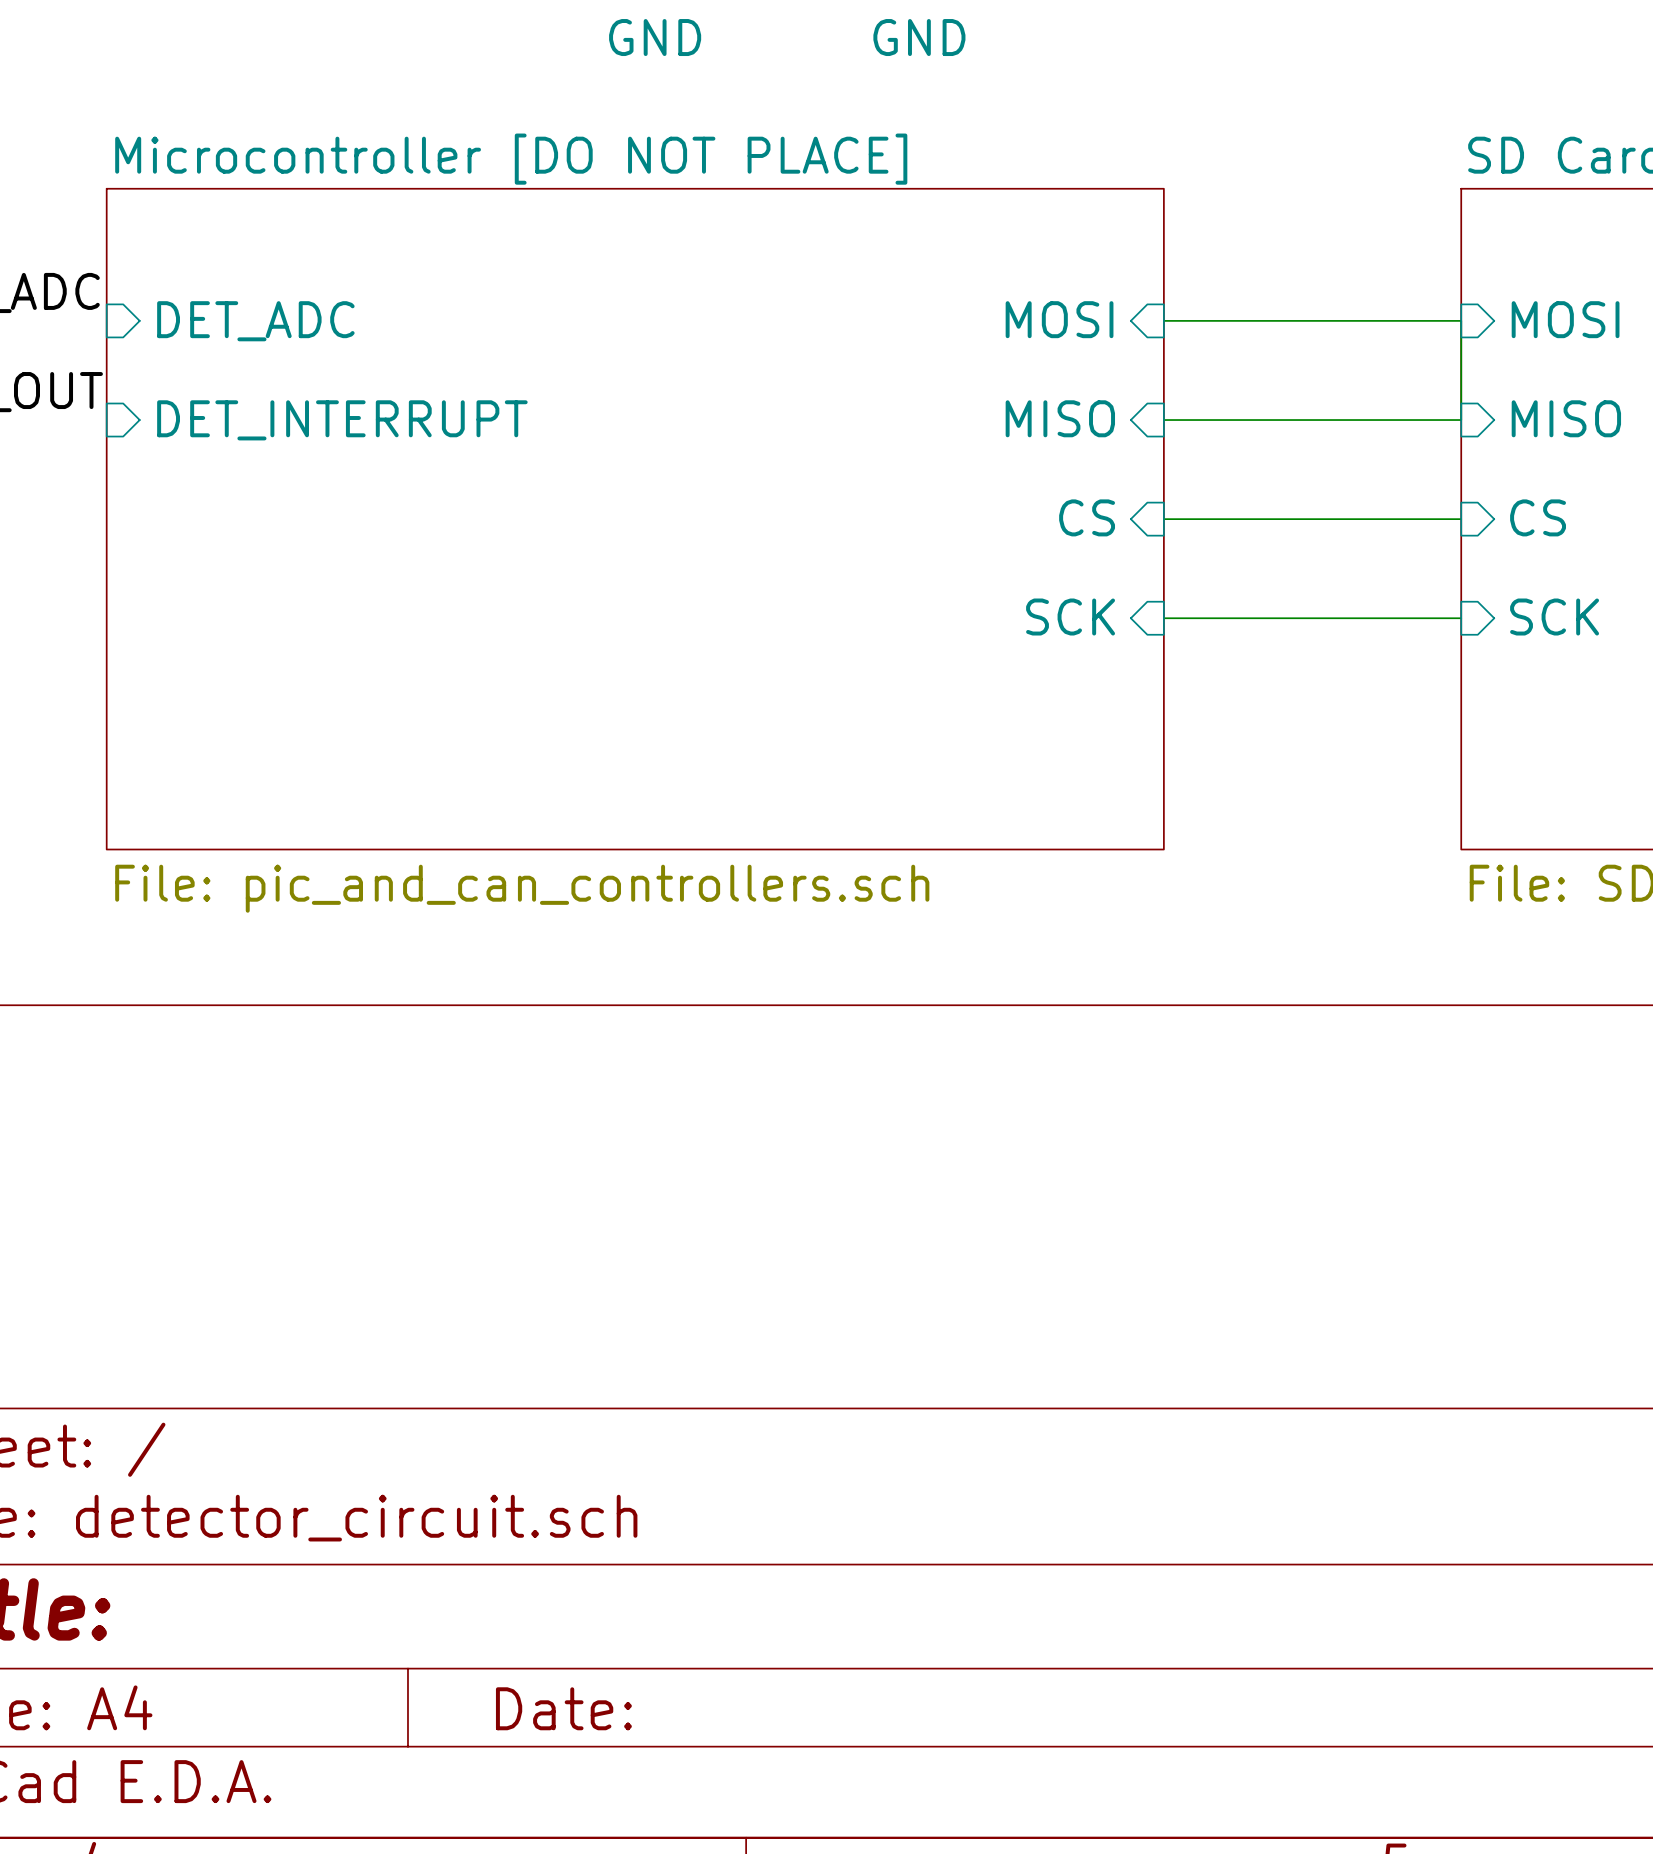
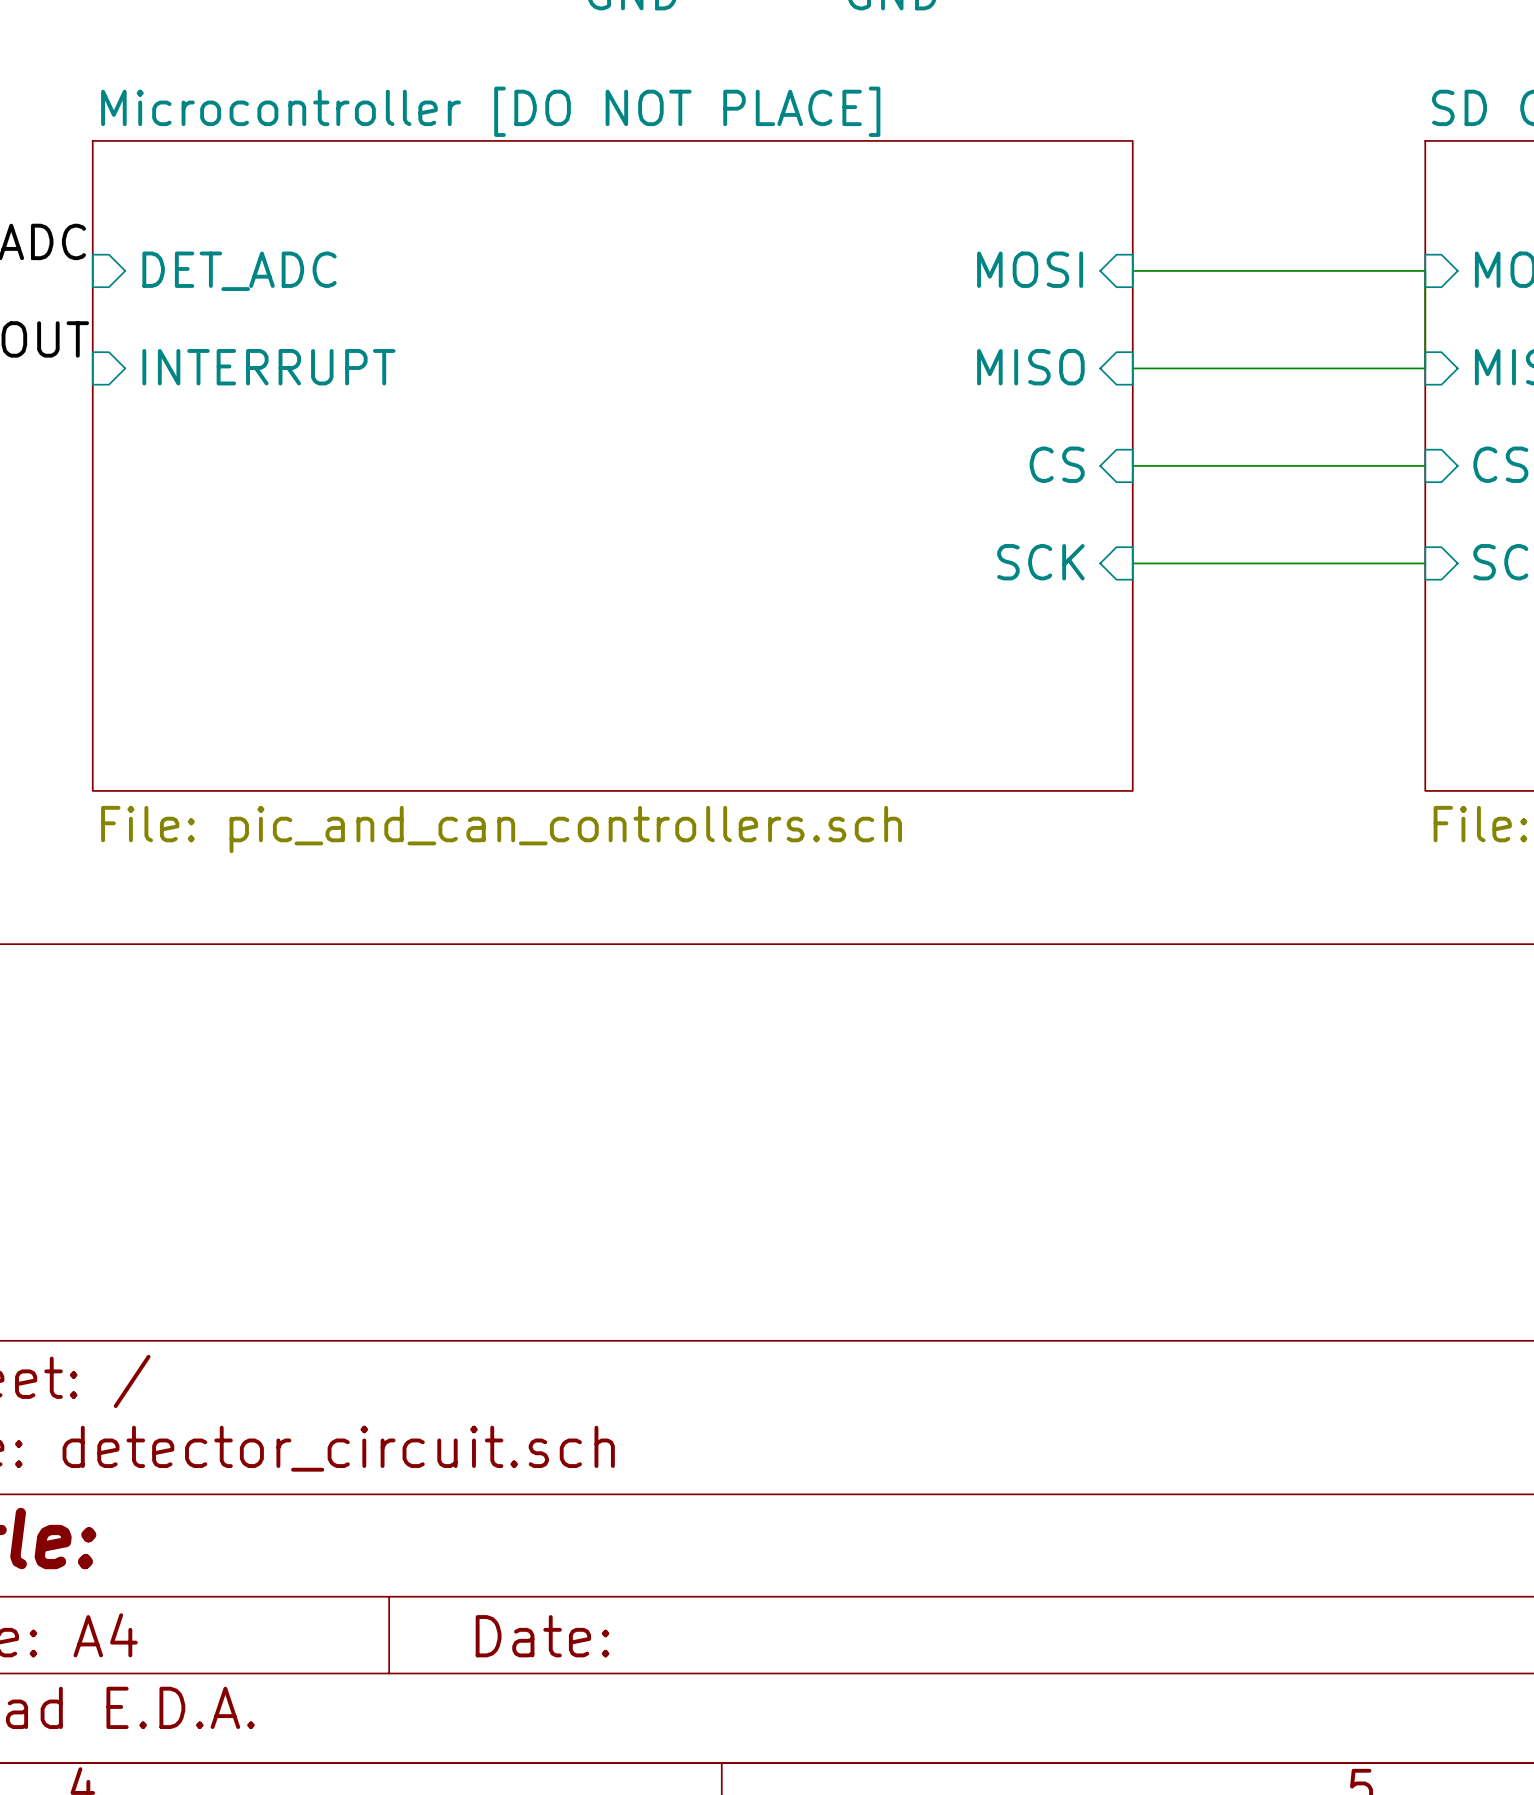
sheet pin: DET_INTERRUPT (342, 420) -> INTERRUPT (268, 367)

